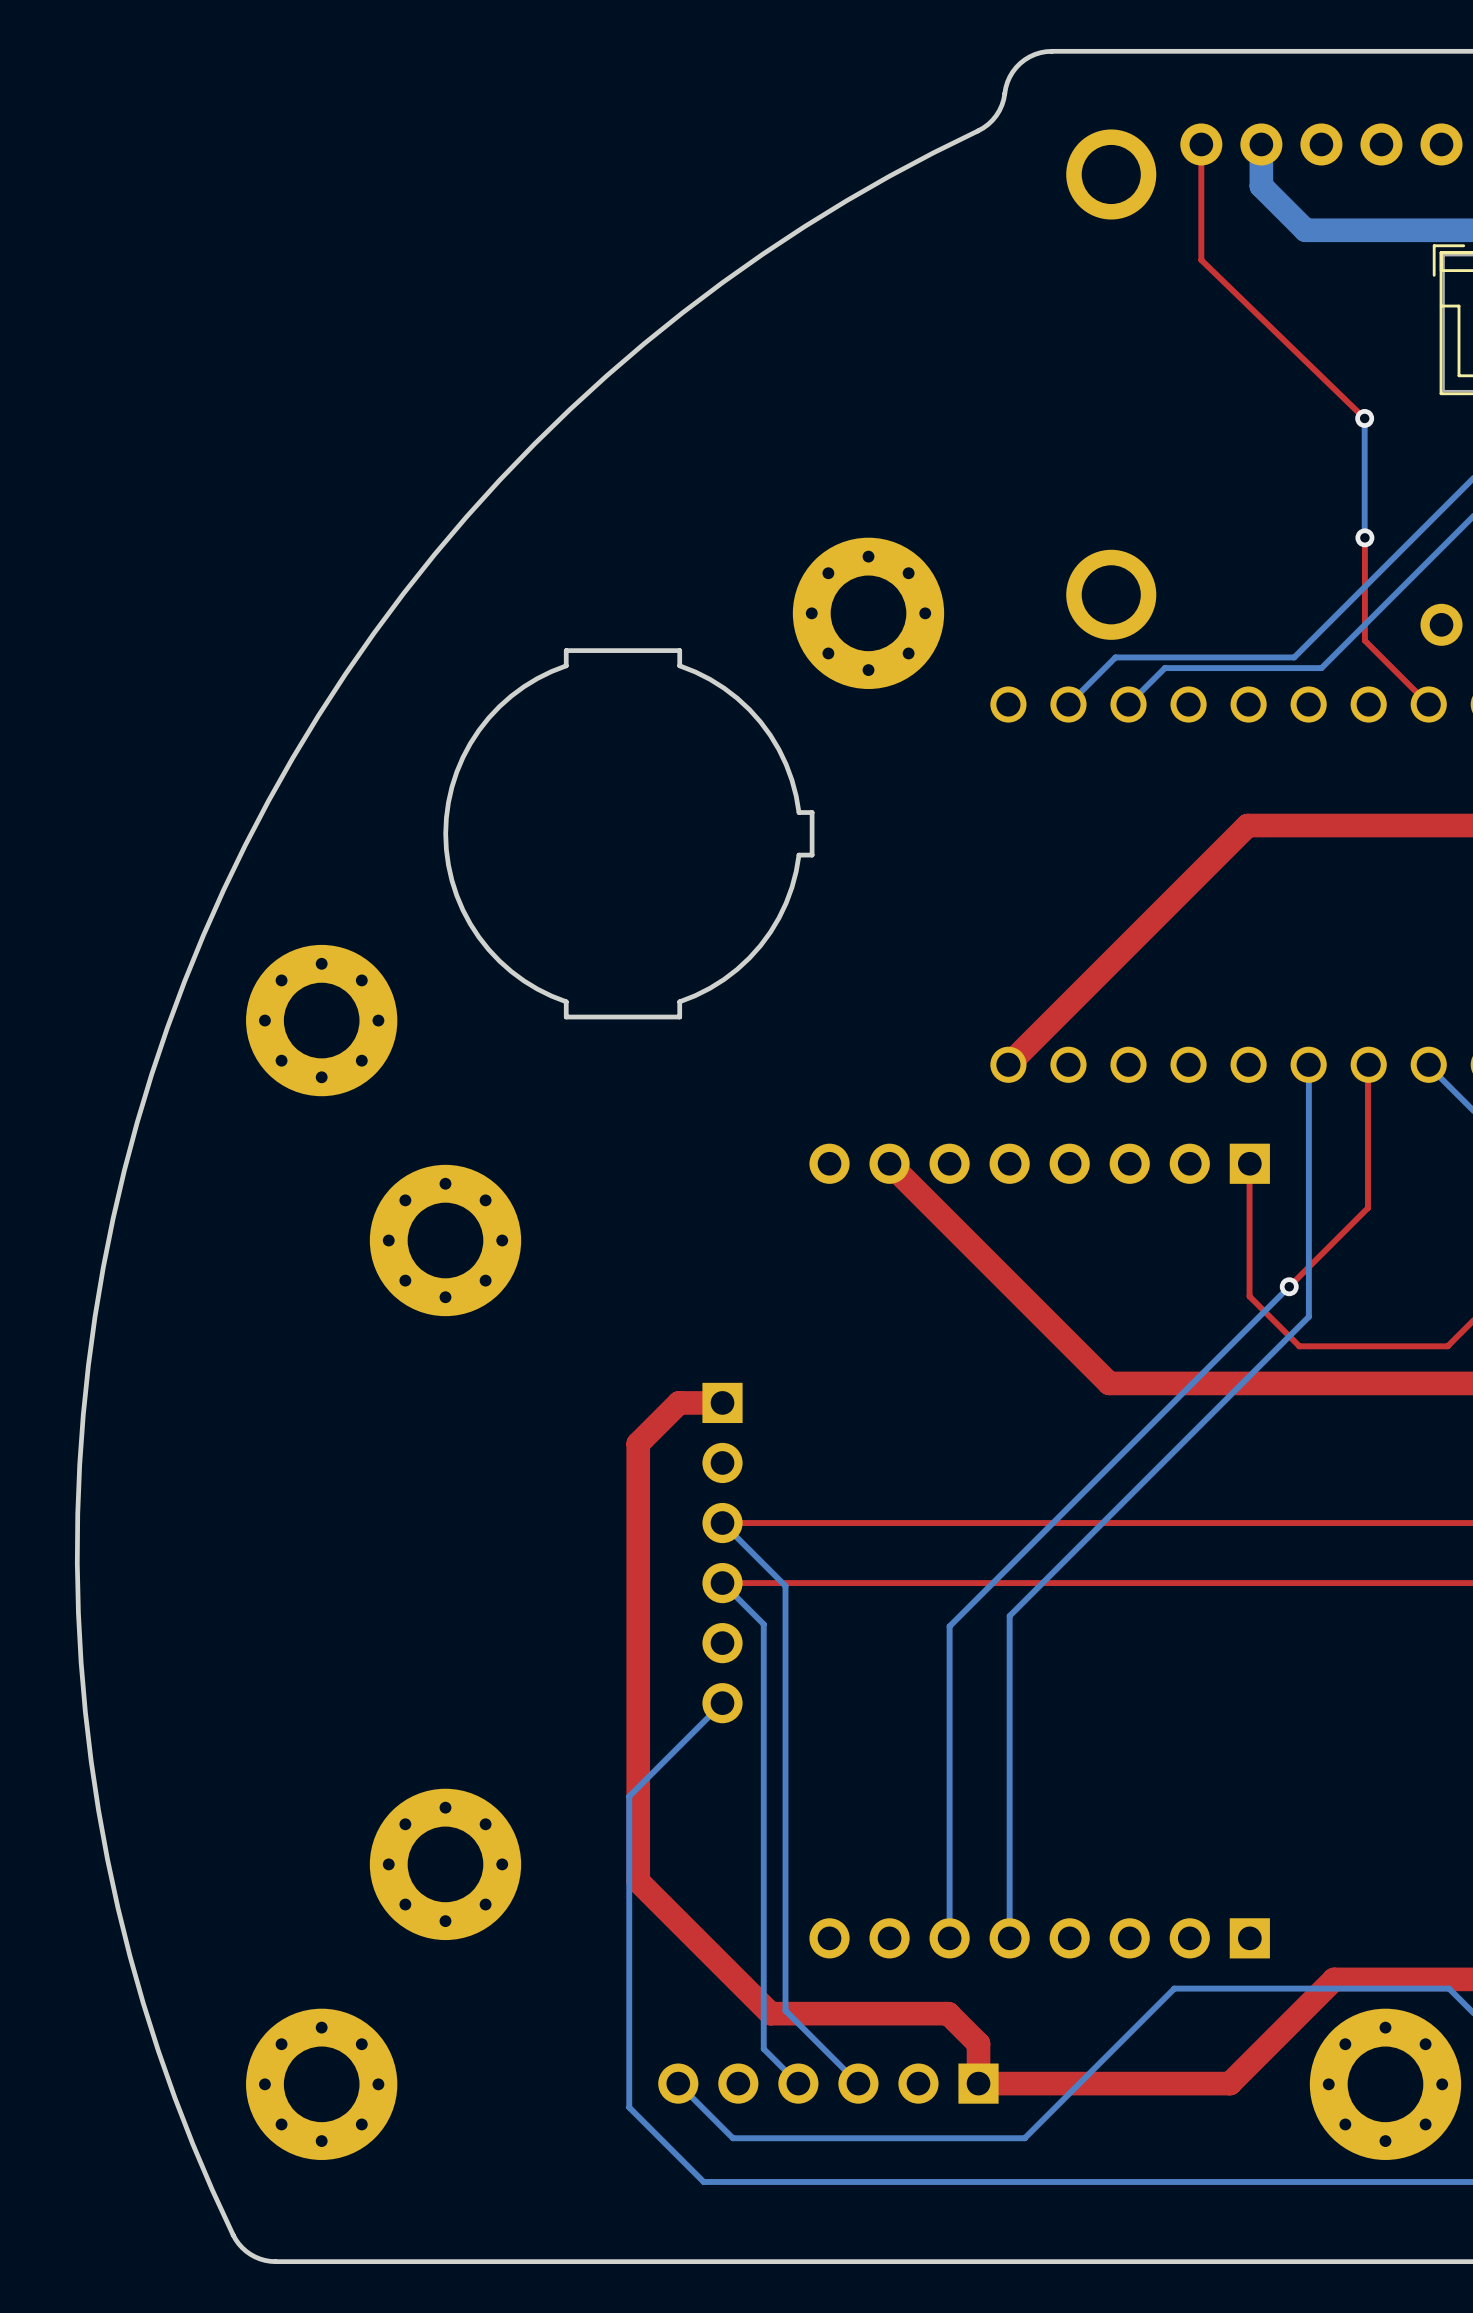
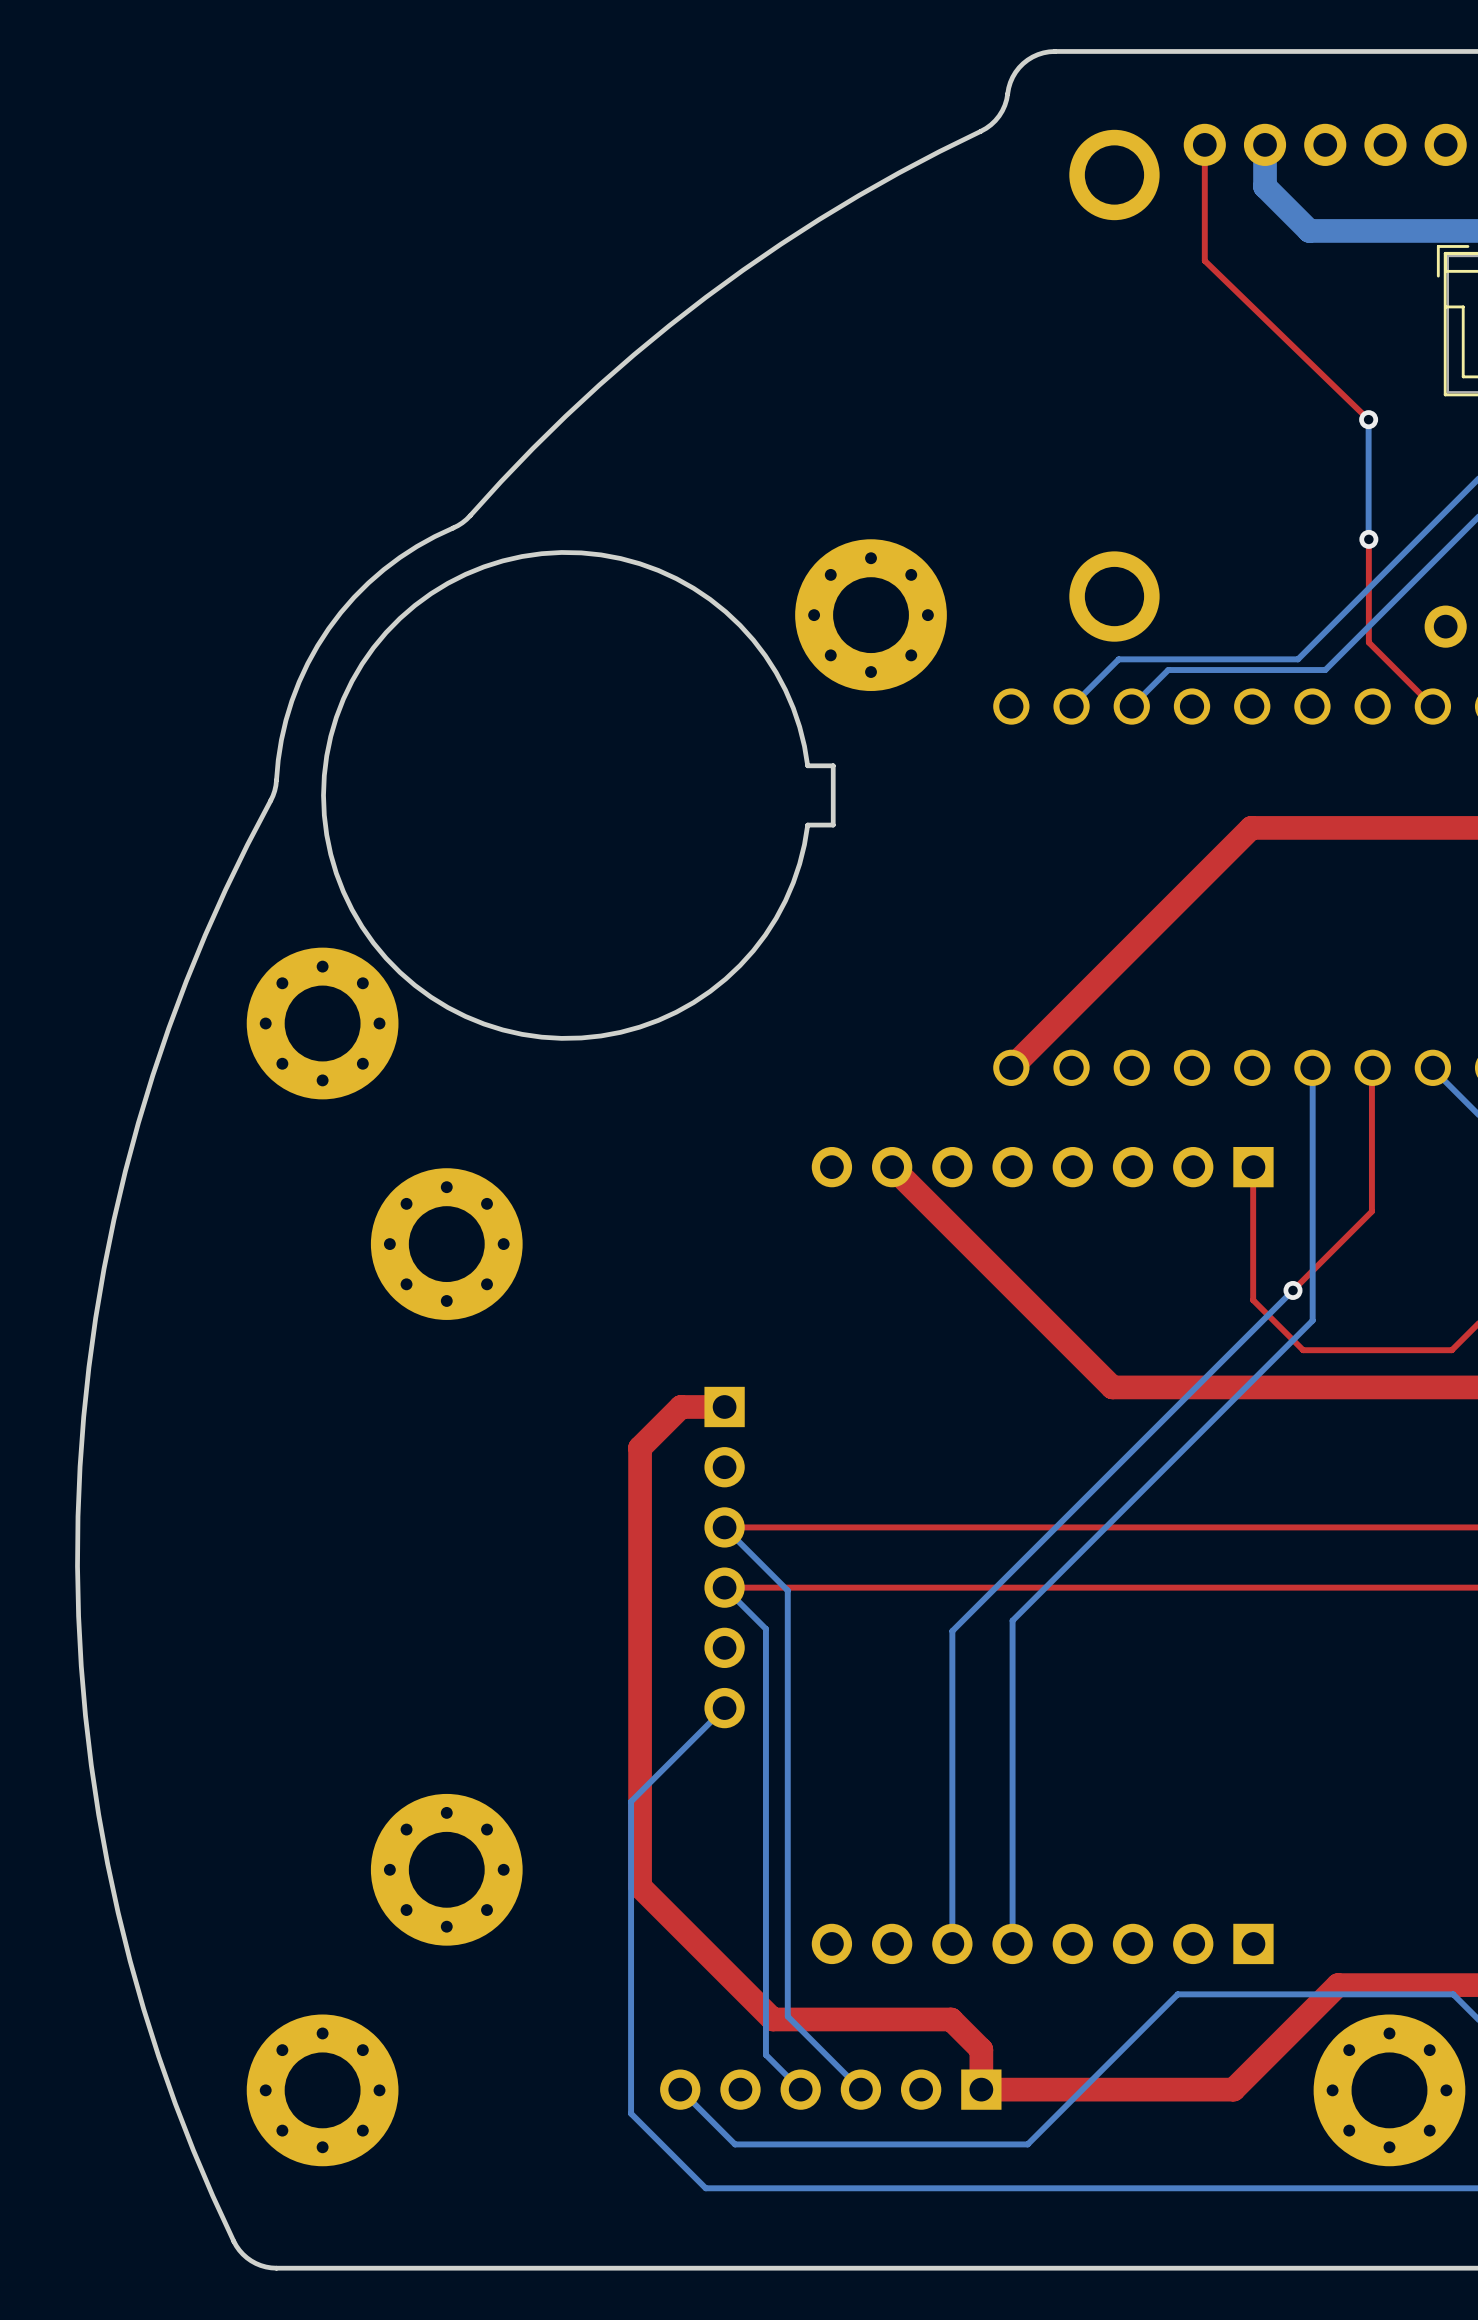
board edge: (978, 130) (889, 176) (846, 200) (804, 226) (722, 282) (644, 343) (606, 376) (569, 409) (499, 480) (434, 554) (403, 593) (373, 633) (318, 715) (292, 758) (245, 845) (203, 935) (167, 1027) (137, 1122) (124, 1170) (113, 1218) (95, 1316) (88, 1365) (79, 1464) (77, 1513) (78, 1613) (85, 1712) (91, 1761) (98, 1810) (117, 1907) (143, 2003) (174, 2097) (192, 2144) (233, 2234) -> (980, 131) (858, 195) (780, 244) (705, 297) (634, 354) (565, 416) (466, 519) (399, 557) (354, 597) (328, 628) (299, 681) (281, 740) (273, 795) (225, 889) (205, 935) (168, 1028) (138, 1123) (113, 1219) (104, 1268) (88, 1367) (80, 1466) (78, 1516) (77, 1566) (81, 1666) (91, 1765) (98, 1814) (107, 1863) (130, 1960) (158, 2056) (175, 2103) (212, 2196) (233, 2241)
board edge: (679, 650) (679, 665) (710, 679) (737, 698) (760, 721) (770, 735) (778, 749) (791, 780) (799, 812) (812, 812) (812, 855) (799, 855) (791, 887) (786, 903) (778, 918) (760, 945) (737, 969) (724, 979) (710, 988) (679, 1001) (679, 1017) (566, 1017) (566, 1001) (537, 989) (511, 971) (488, 949) (462, 910) (451, 880) (446, 849) (446, 818) (451, 787) (470, 743) (488, 718) (523, 686) (566, 665) (566, 650) (679, 650) -> (833, 765) (833, 825) (807, 825) (799, 863) (785, 900) (765, 935) (740, 965) (710, 991) (693, 1002) (658, 1020) (620, 1032) (581, 1037) (541, 1037) (522, 1034) (483, 1023) (447, 1007) (431, 997) (400, 972) (373, 943) (352, 909) (343, 891) (330, 854) (324, 815) (324, 775) (330, 736) (336, 717) (352, 681) (373, 647) (386, 632) (415, 605) (447, 583) (465, 574) (502, 560) (541, 553) (581, 552) (620, 558) (658, 570) (693, 588) (710, 599) (740, 625) (765, 655) (776, 672) (785, 690) (799, 727) (807, 765) (833, 765)

